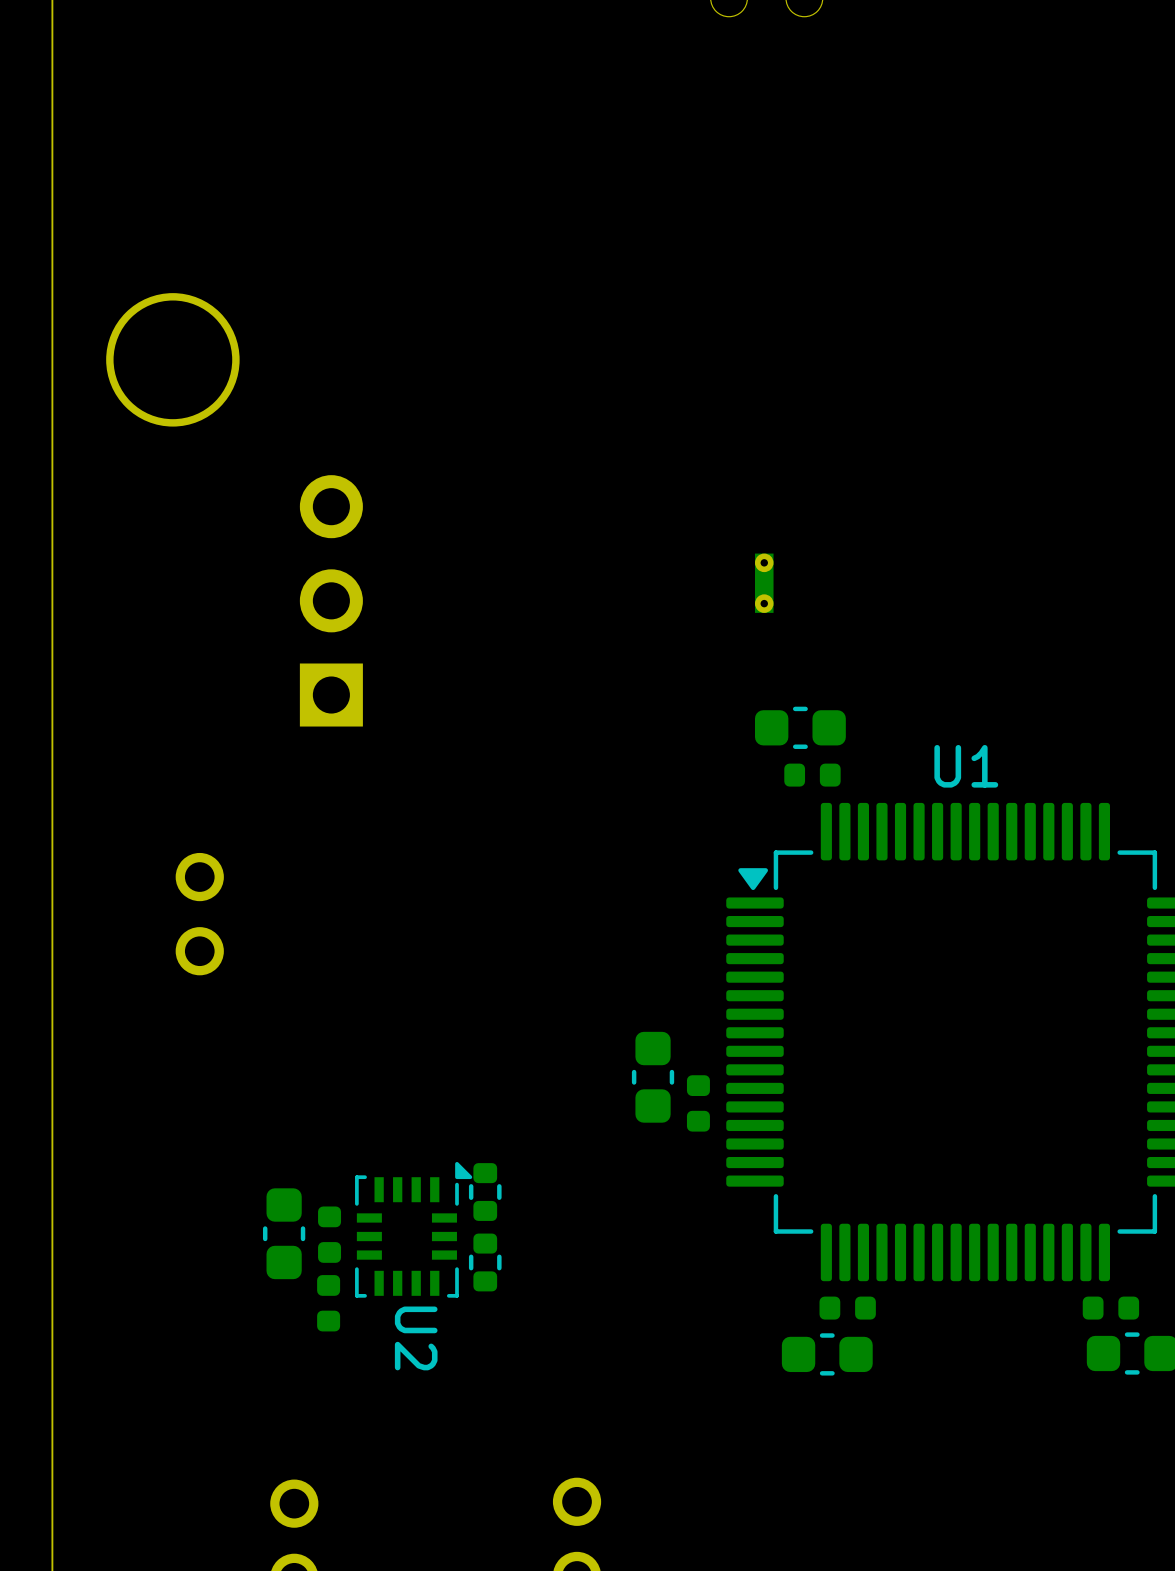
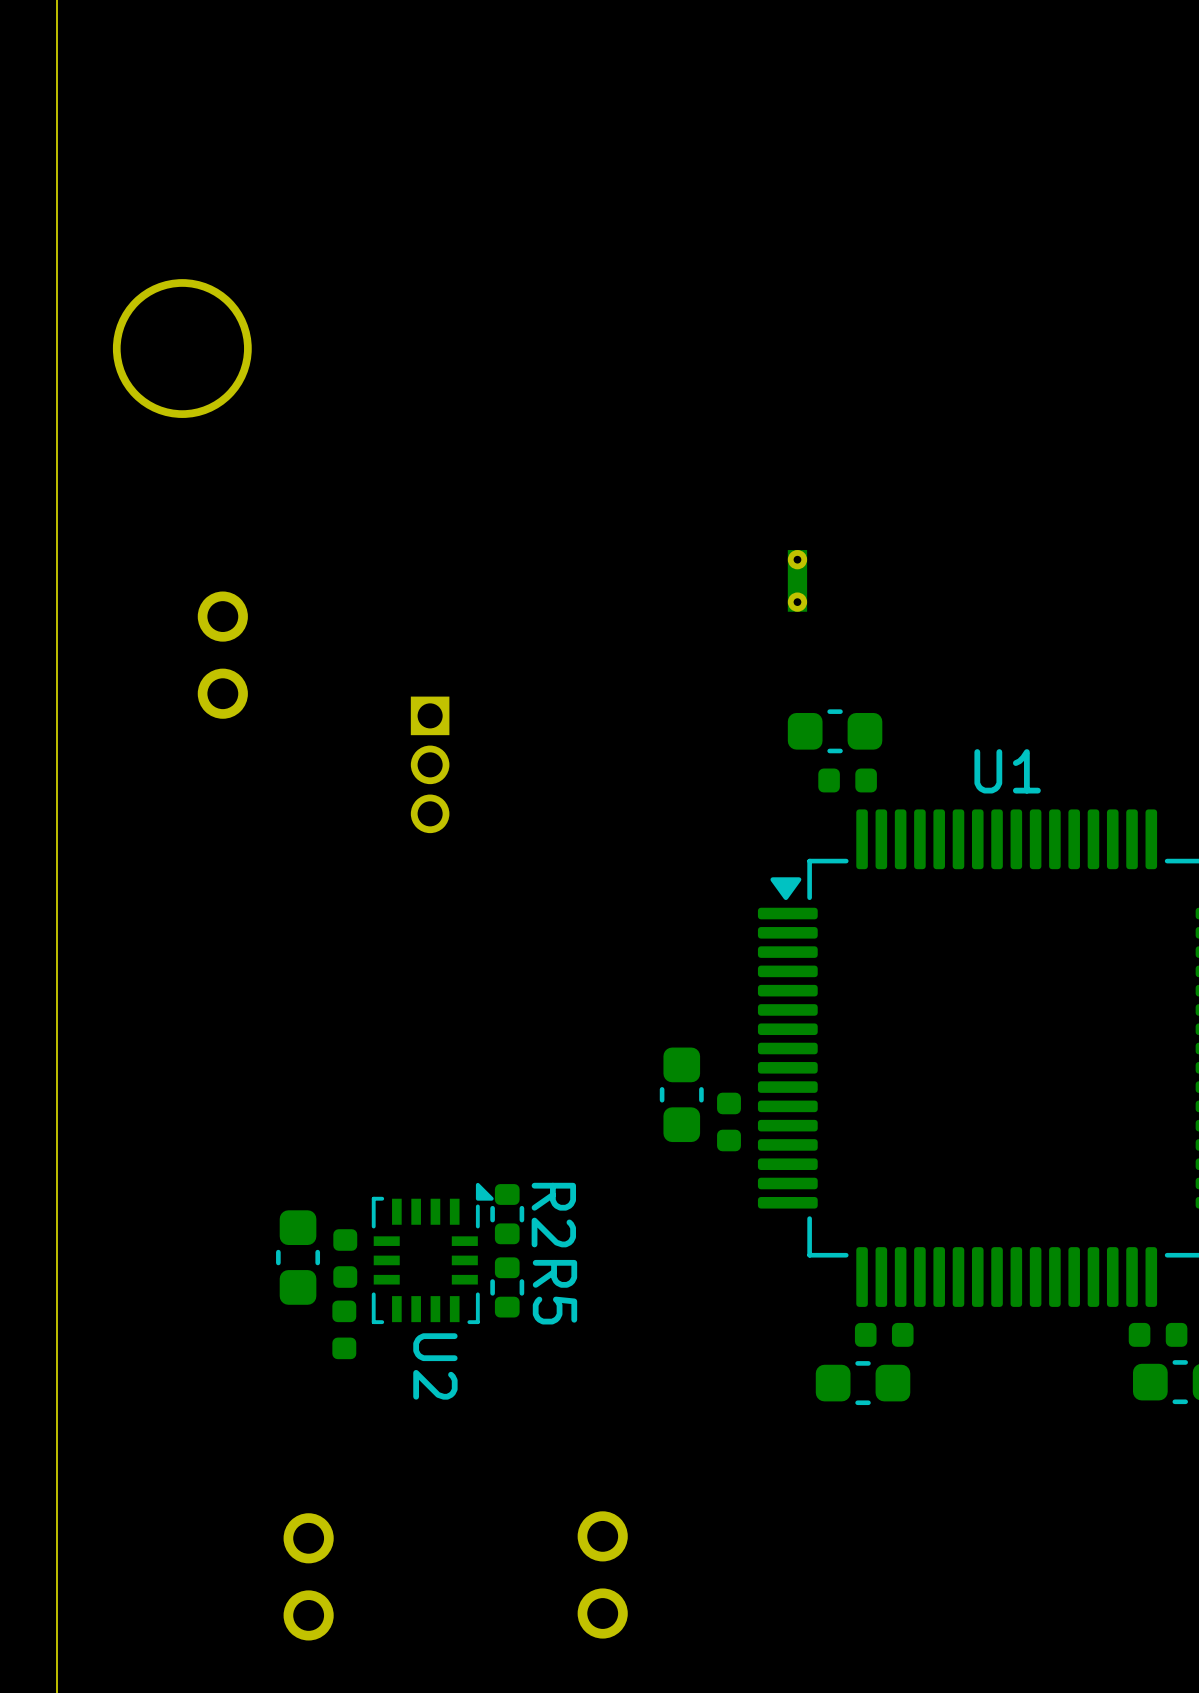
part: (331, 600) -> none
part: none -> (430, 764)
part position: (199, 914) -> (222, 655)
R2 name: none -> R2 (553, 1215)
R5 name: none -> R5 (554, 1292)

